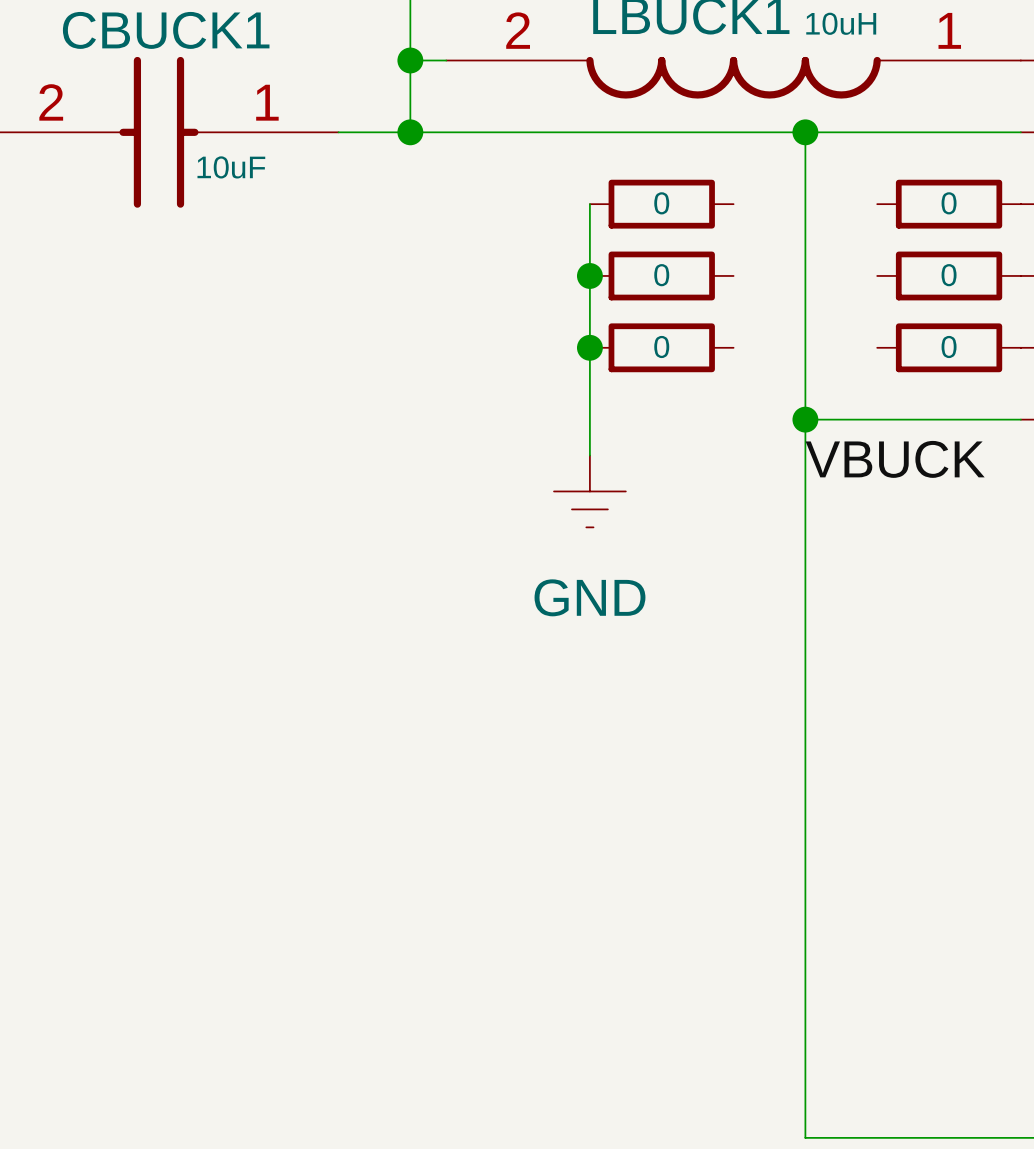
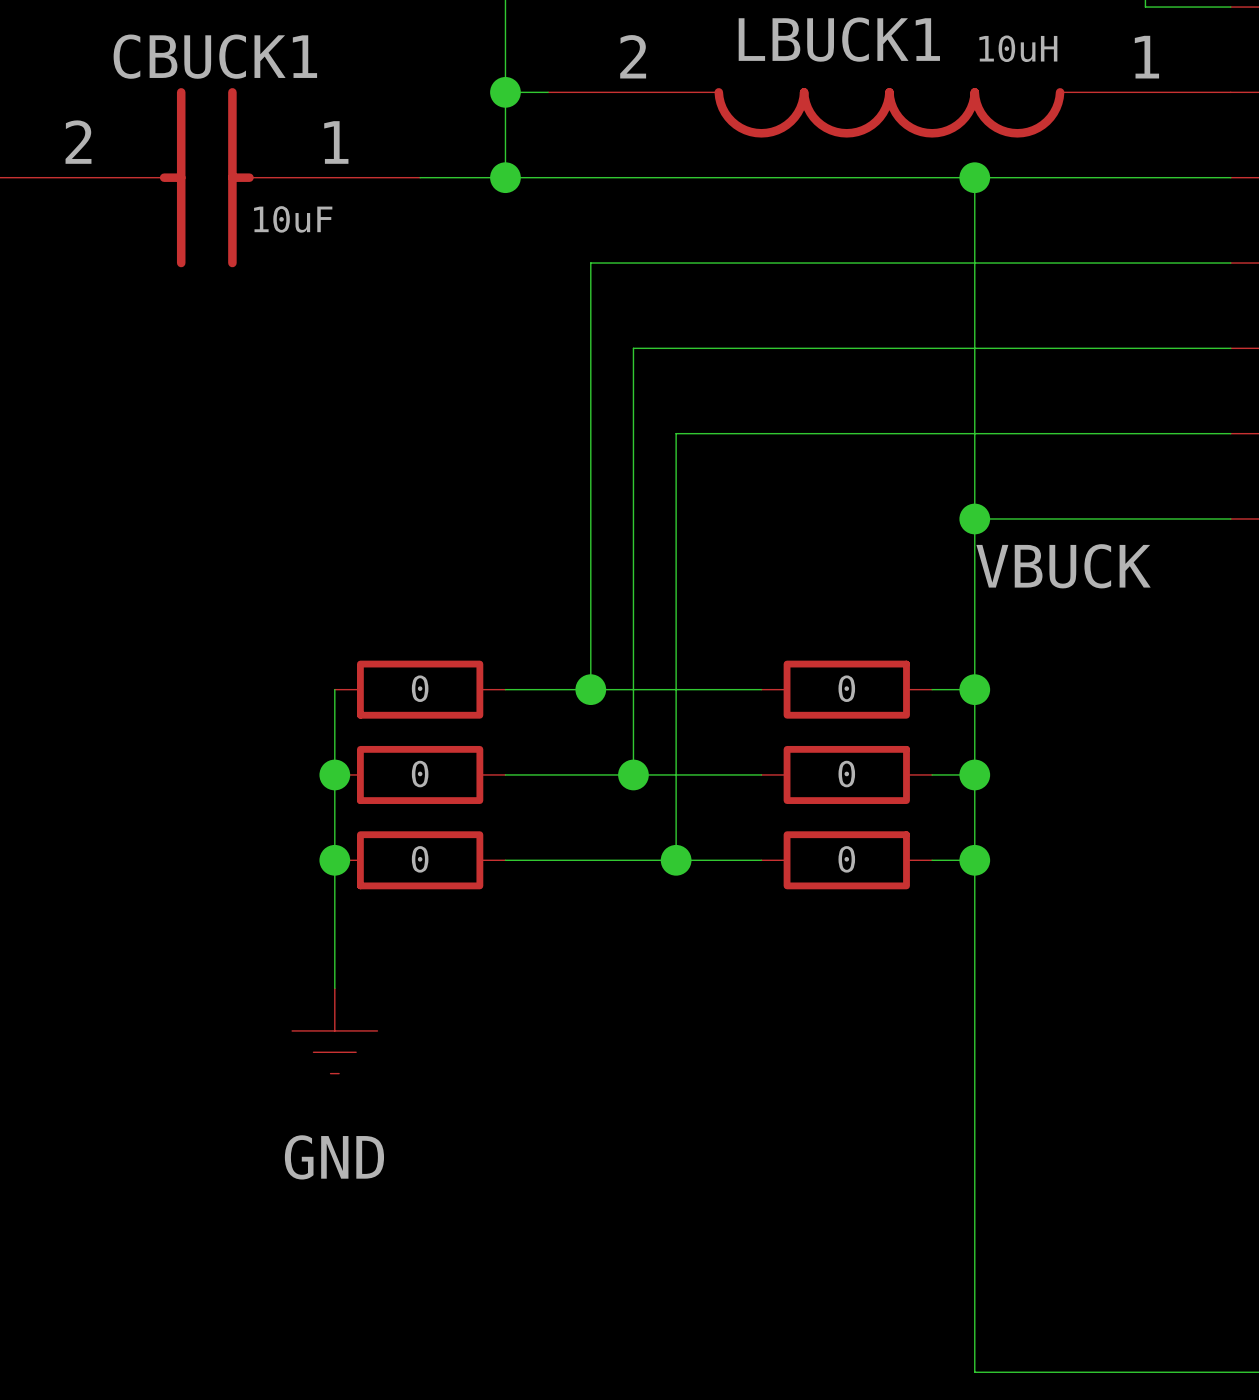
wire: (589, 204) (589, 455) -> (334, 689) (334, 988)
part: 0 (661, 204) -> none
part: 0 (949, 204) -> none
wire: none -> (1230, 263) (590, 263) (590, 689)
junction: (589, 275) -> none
part: 0 (661, 275) -> none
part: 0 (949, 275) -> none
wire: none -> (1230, 348) (633, 348) (633, 774)
junction: (589, 347) -> none
part: 0 (661, 347) -> none
part: 0 (949, 347) -> none
wire: none -> (1230, 433) (676, 433) (676, 860)
power symbol position: GND (589, 491) -> GND (334, 1030)
part: none -> 0 (420, 689)
wire: none -> (505, 689) (761, 689)
junction: none -> (590, 689)
part: none -> 0 (846, 689)
wire: none -> (932, 689) (974, 689)
junction: none -> (974, 689)
junction: none -> (334, 774)
part: none -> 0 (420, 774)
wire: none -> (505, 774) (761, 774)
junction: none -> (633, 774)
part: none -> 0 (846, 774)
wire: none -> (932, 774) (974, 774)
junction: none -> (974, 774)
junction: none -> (334, 860)
part: none -> 0 (420, 860)
wire: none -> (505, 860) (761, 860)
junction: none -> (676, 860)
part: none -> 0 (846, 860)
wire: none -> (932, 860) (974, 860)
junction: none -> (974, 860)

